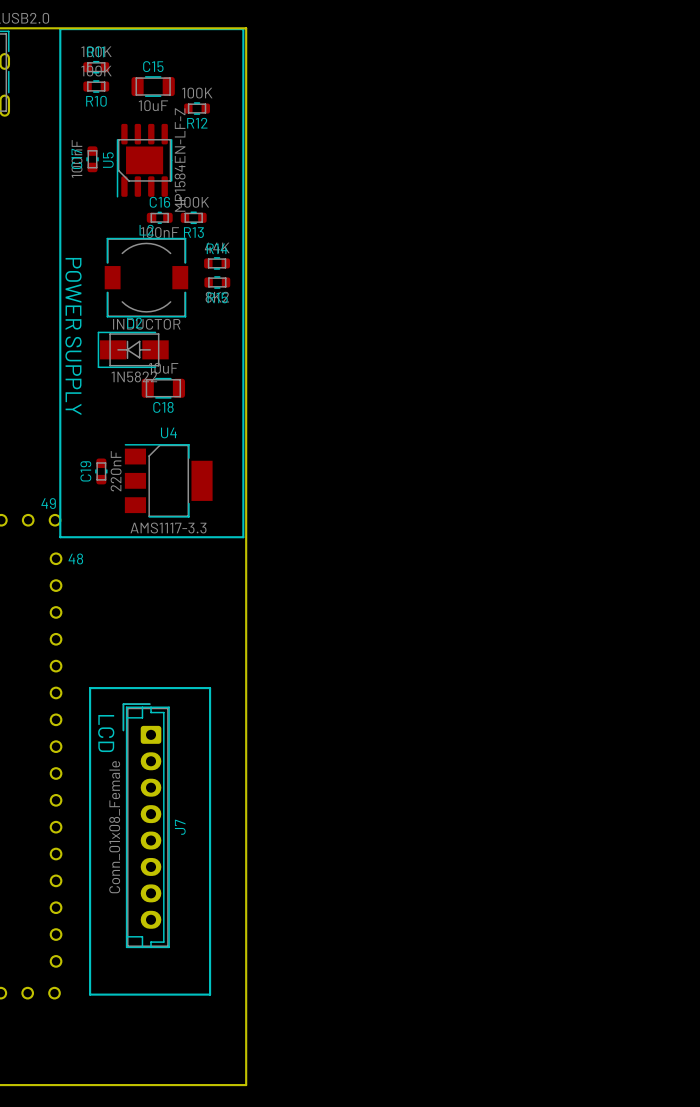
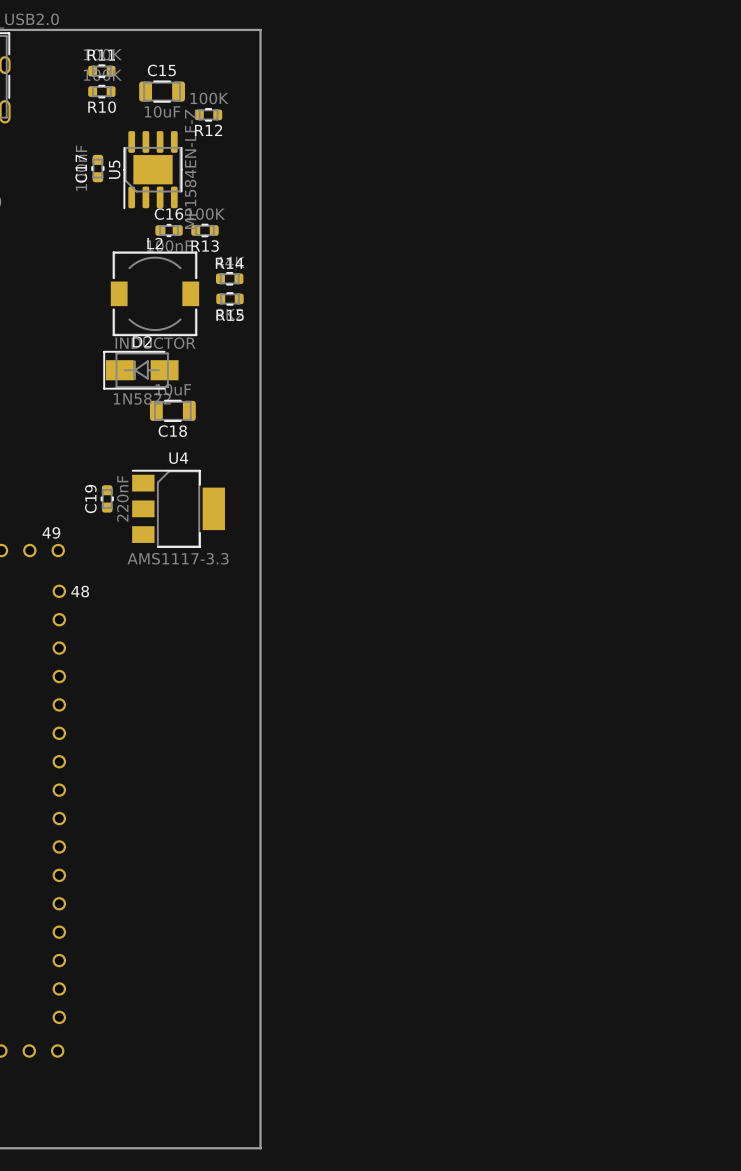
line: (60, 29) (243, 29) (243, 537) (60, 537) (60, 29) -> none
text: POWER SUPPLY (73, 336) -> none
line: (90, 688) (210, 688) (210, 994) (90, 994) (90, 688) -> none
text: LCD (106, 733) -> none
J7: Conn_01x08_Female (146, 825) -> none

